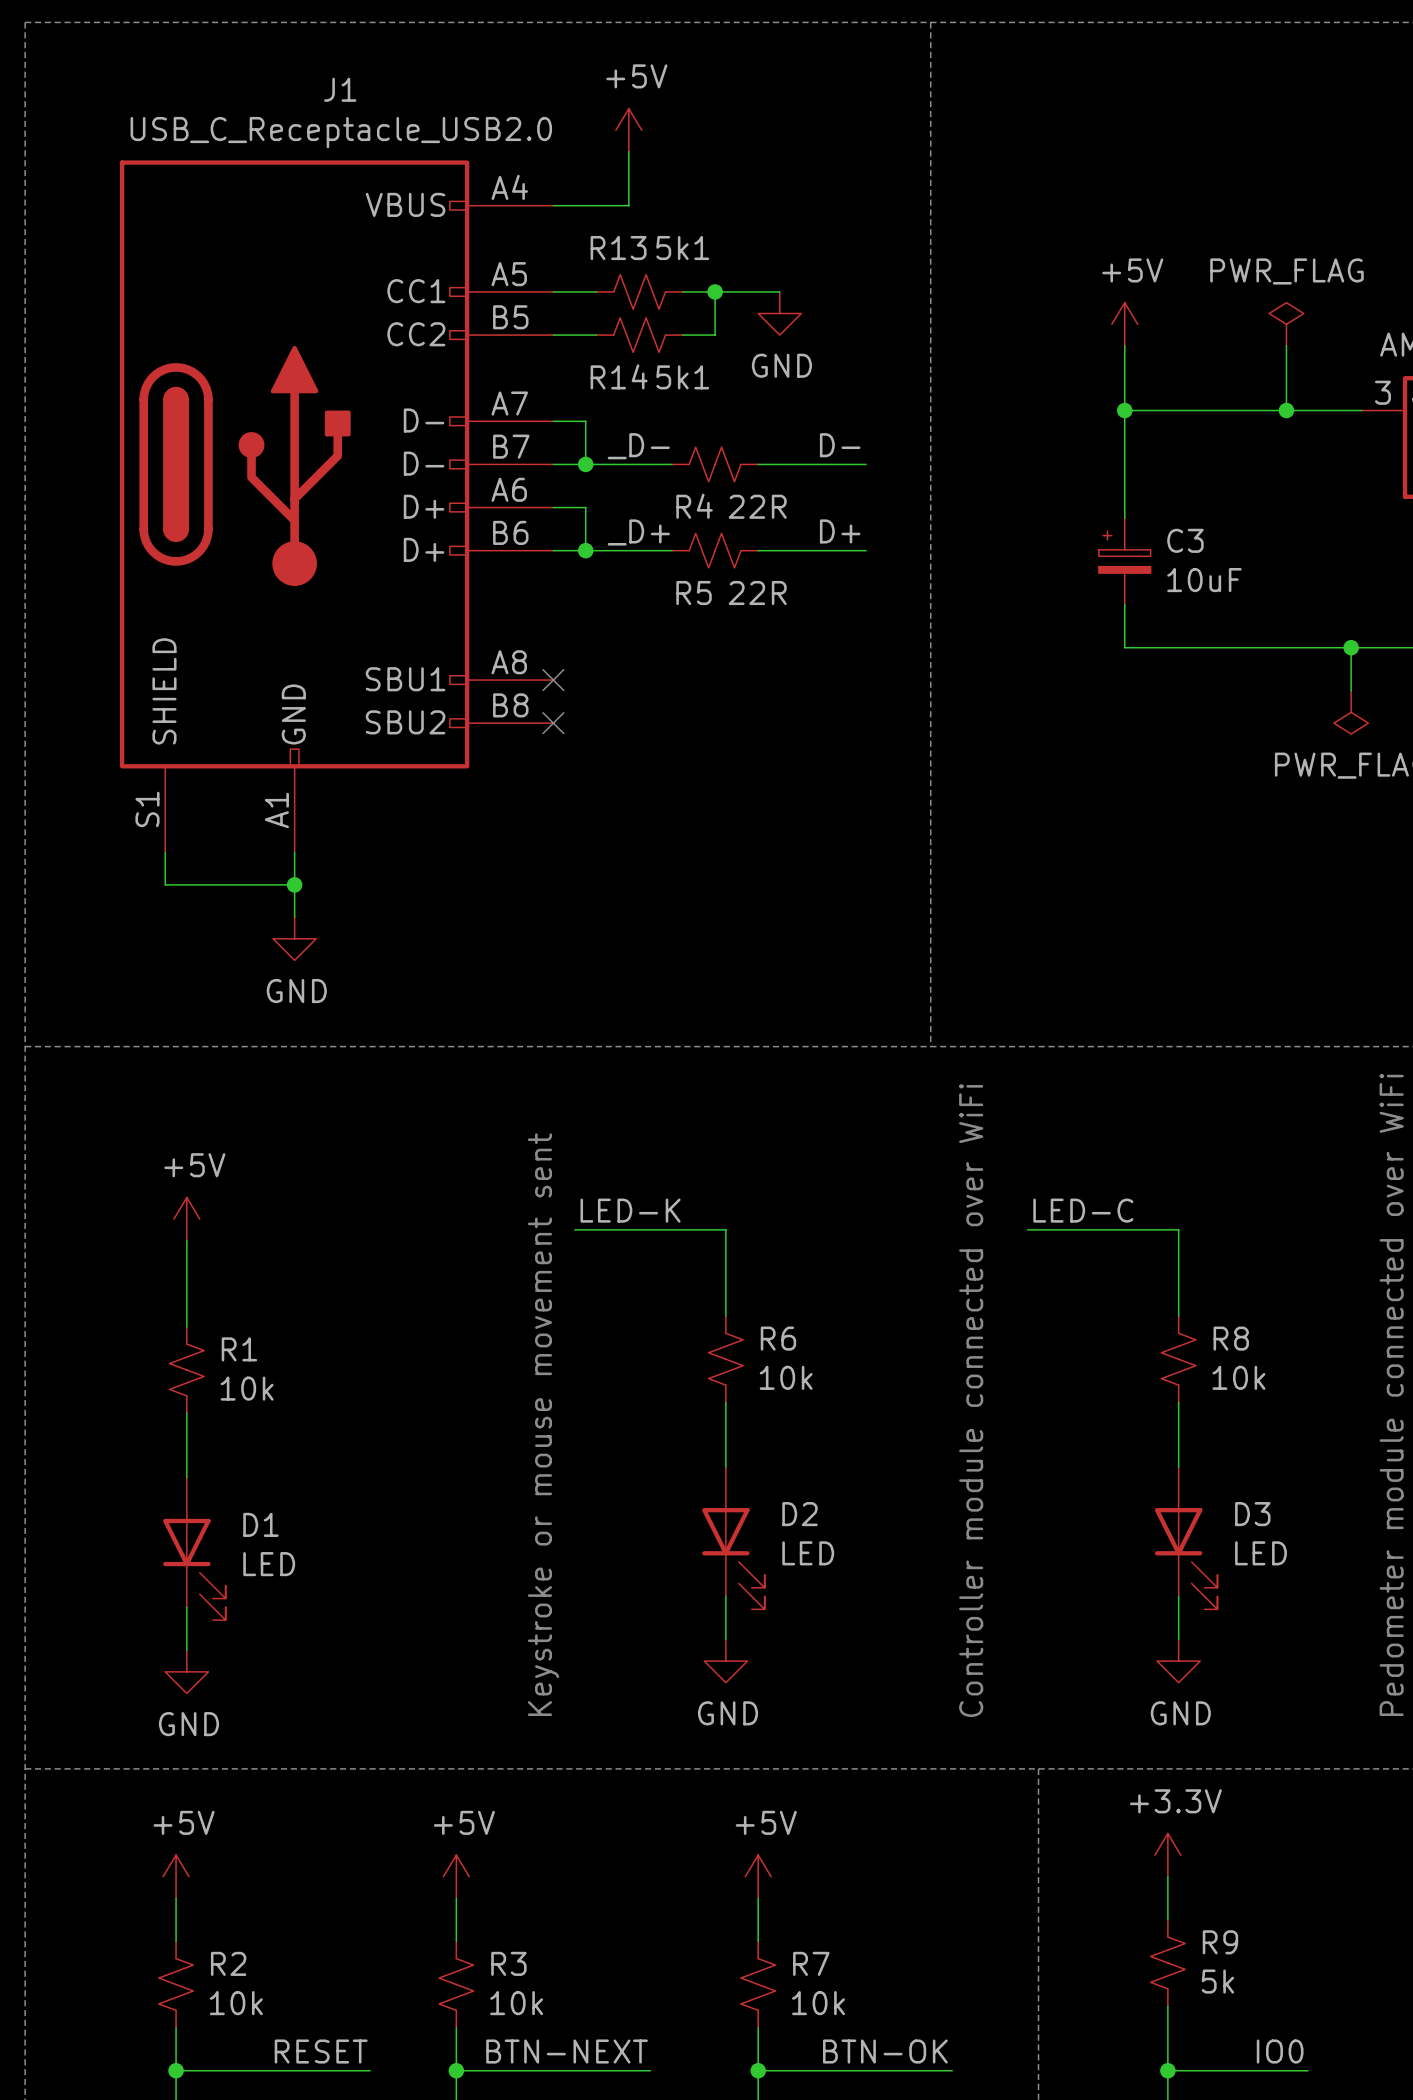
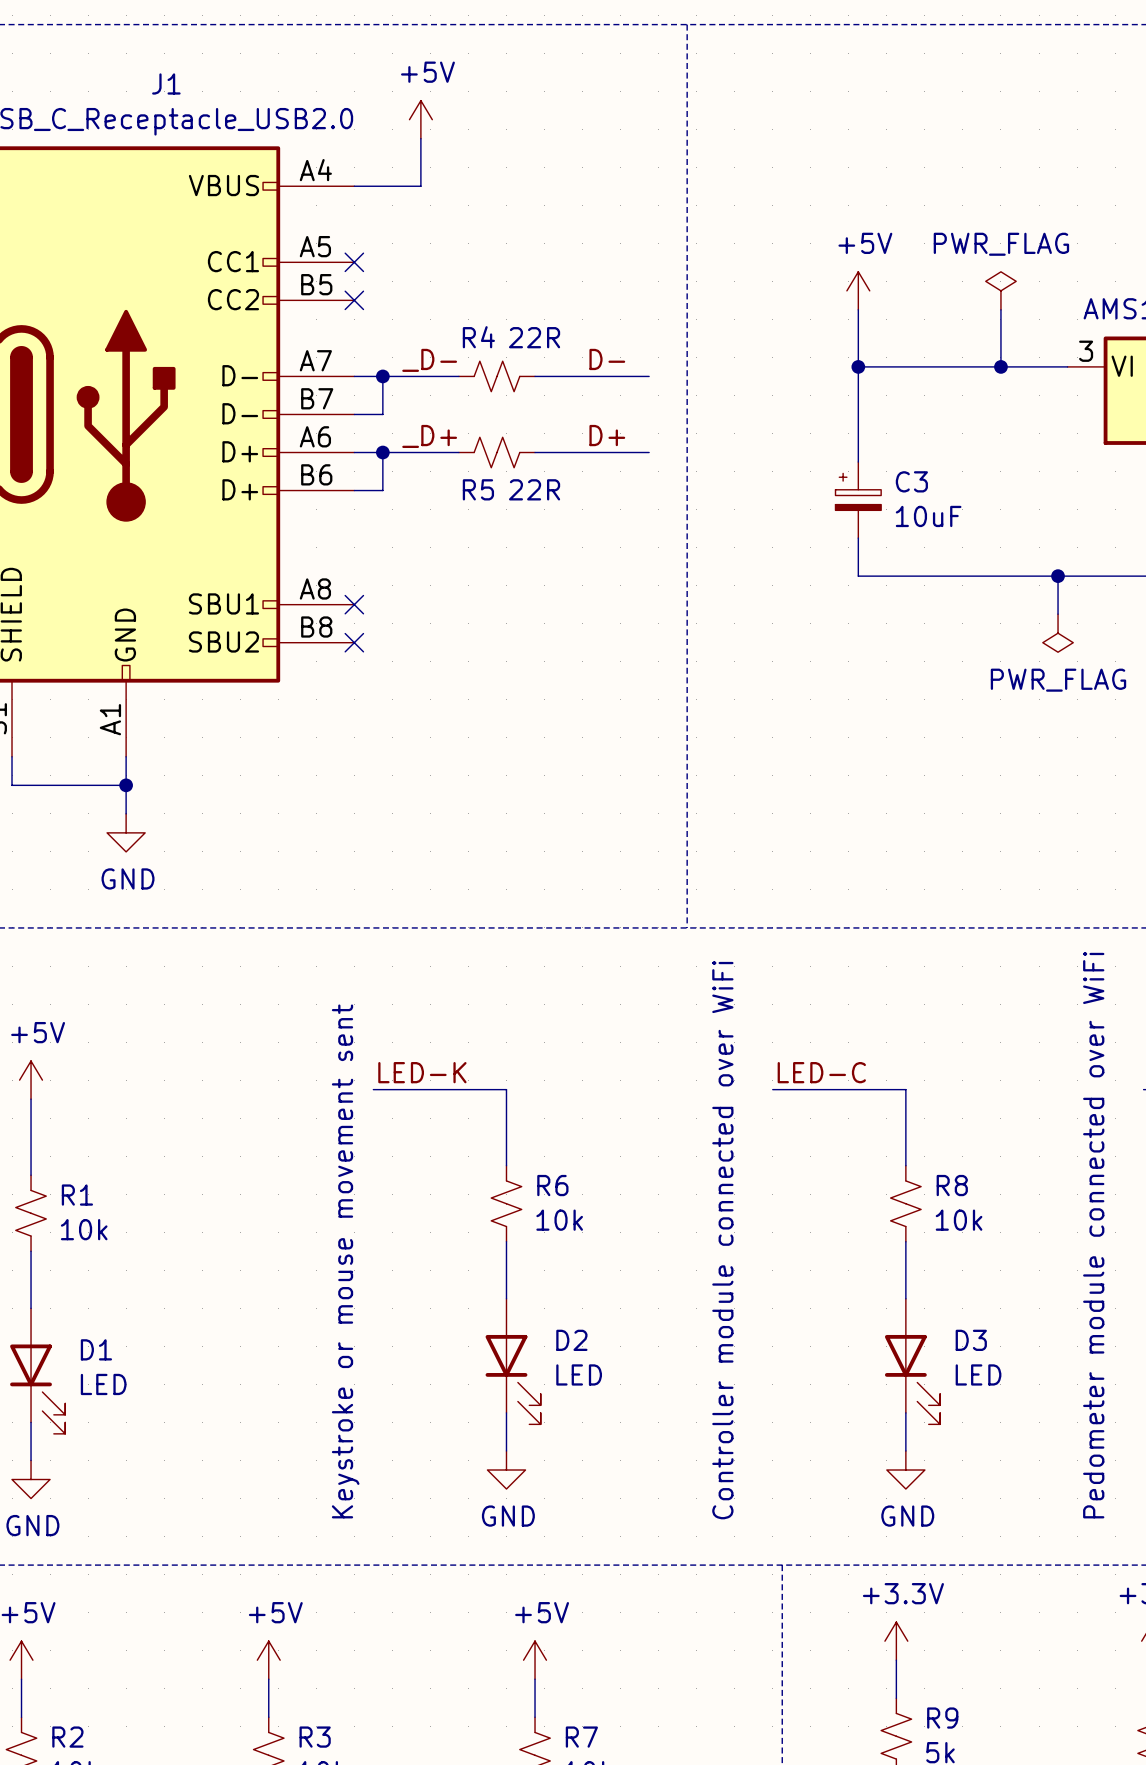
wire: (553, 291) (596, 291) -> none
no-connect mark: none -> (354, 262)
R13: 5k1 (639, 291) -> none
wire: (682, 291) (779, 291) -> none
wire: (715, 291) (715, 335) (682, 335) -> none
junction: (715, 291) -> none
power symbol: GND (779, 313) -> none
wire: (553, 335) (596, 335) -> none
no-connect mark: none -> (354, 300)
R14: 5k1 (639, 335) -> none
junction: none -> (382, 376)
wire: none -> (535, 376) (649, 376)
label position: D- (840, 445) -> D- (607, 359)
label position: _D- (638, 446) -> _D- (429, 360)
wire: (585, 464) (671, 464) -> (382, 376) (458, 376)
junction: (585, 464) -> none
R4 position: (715, 464) -> (496, 376)
wire: (758, 464) (866, 464) -> none
R4 name position: R4 (694, 506) -> R4 (478, 337)
R4 value position: 22R (757, 506) -> 22R (534, 337)
junction: none -> (382, 452)
wire: none -> (535, 452) (649, 452)
label position: D+ (840, 531) -> D+ (607, 435)
label position: _D+ (638, 532) -> _D+ (429, 436)
wire: (585, 550) (671, 550) -> (382, 452) (458, 452)
junction: (585, 550) -> none
R5 position: (715, 550) -> (496, 452)
wire: (758, 550) (866, 550) -> none

